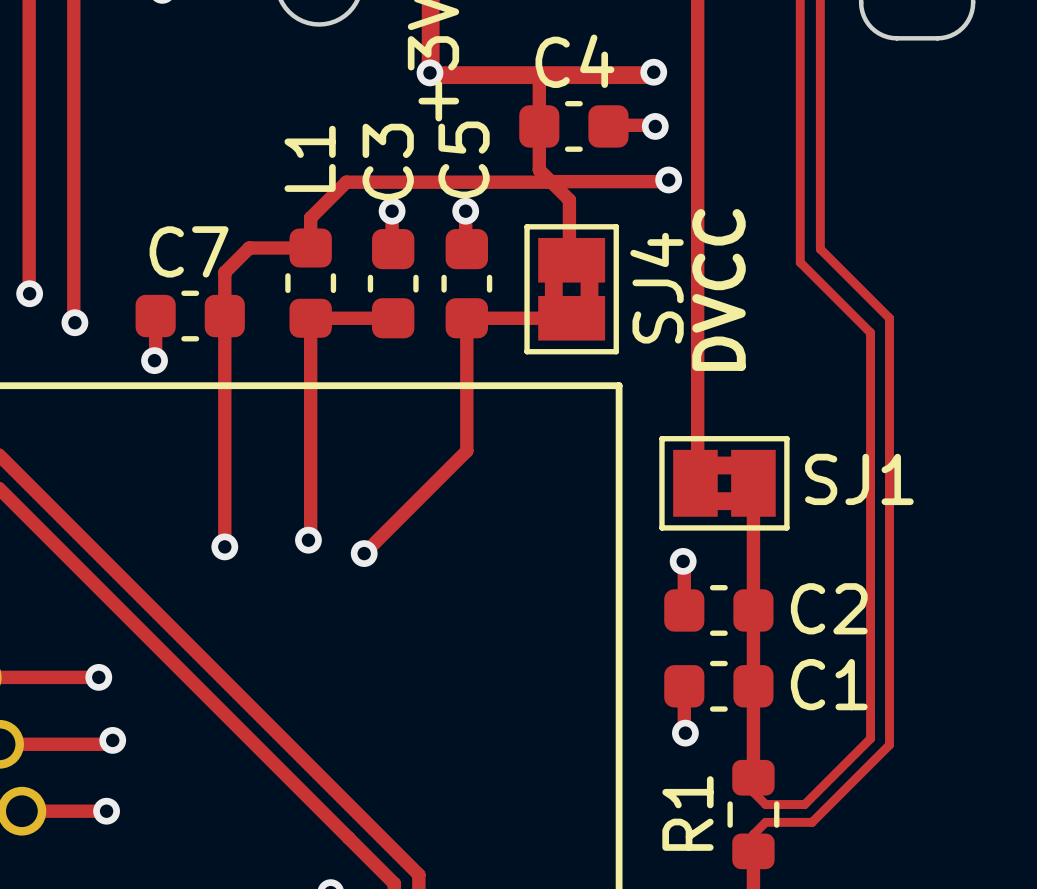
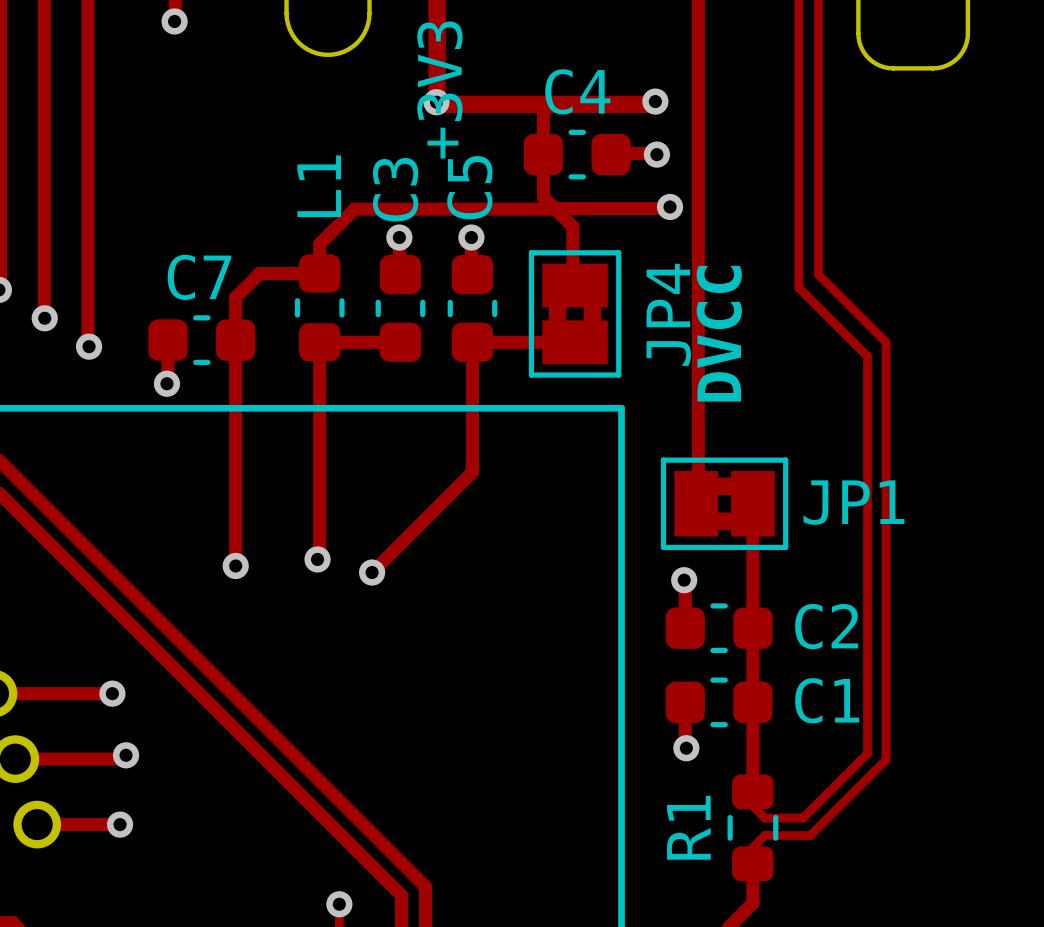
SJ4 name: SJ4 (657, 288) -> JP4 (668, 314)
SJ1 name: SJ1 (859, 479) -> JP1 (853, 502)

